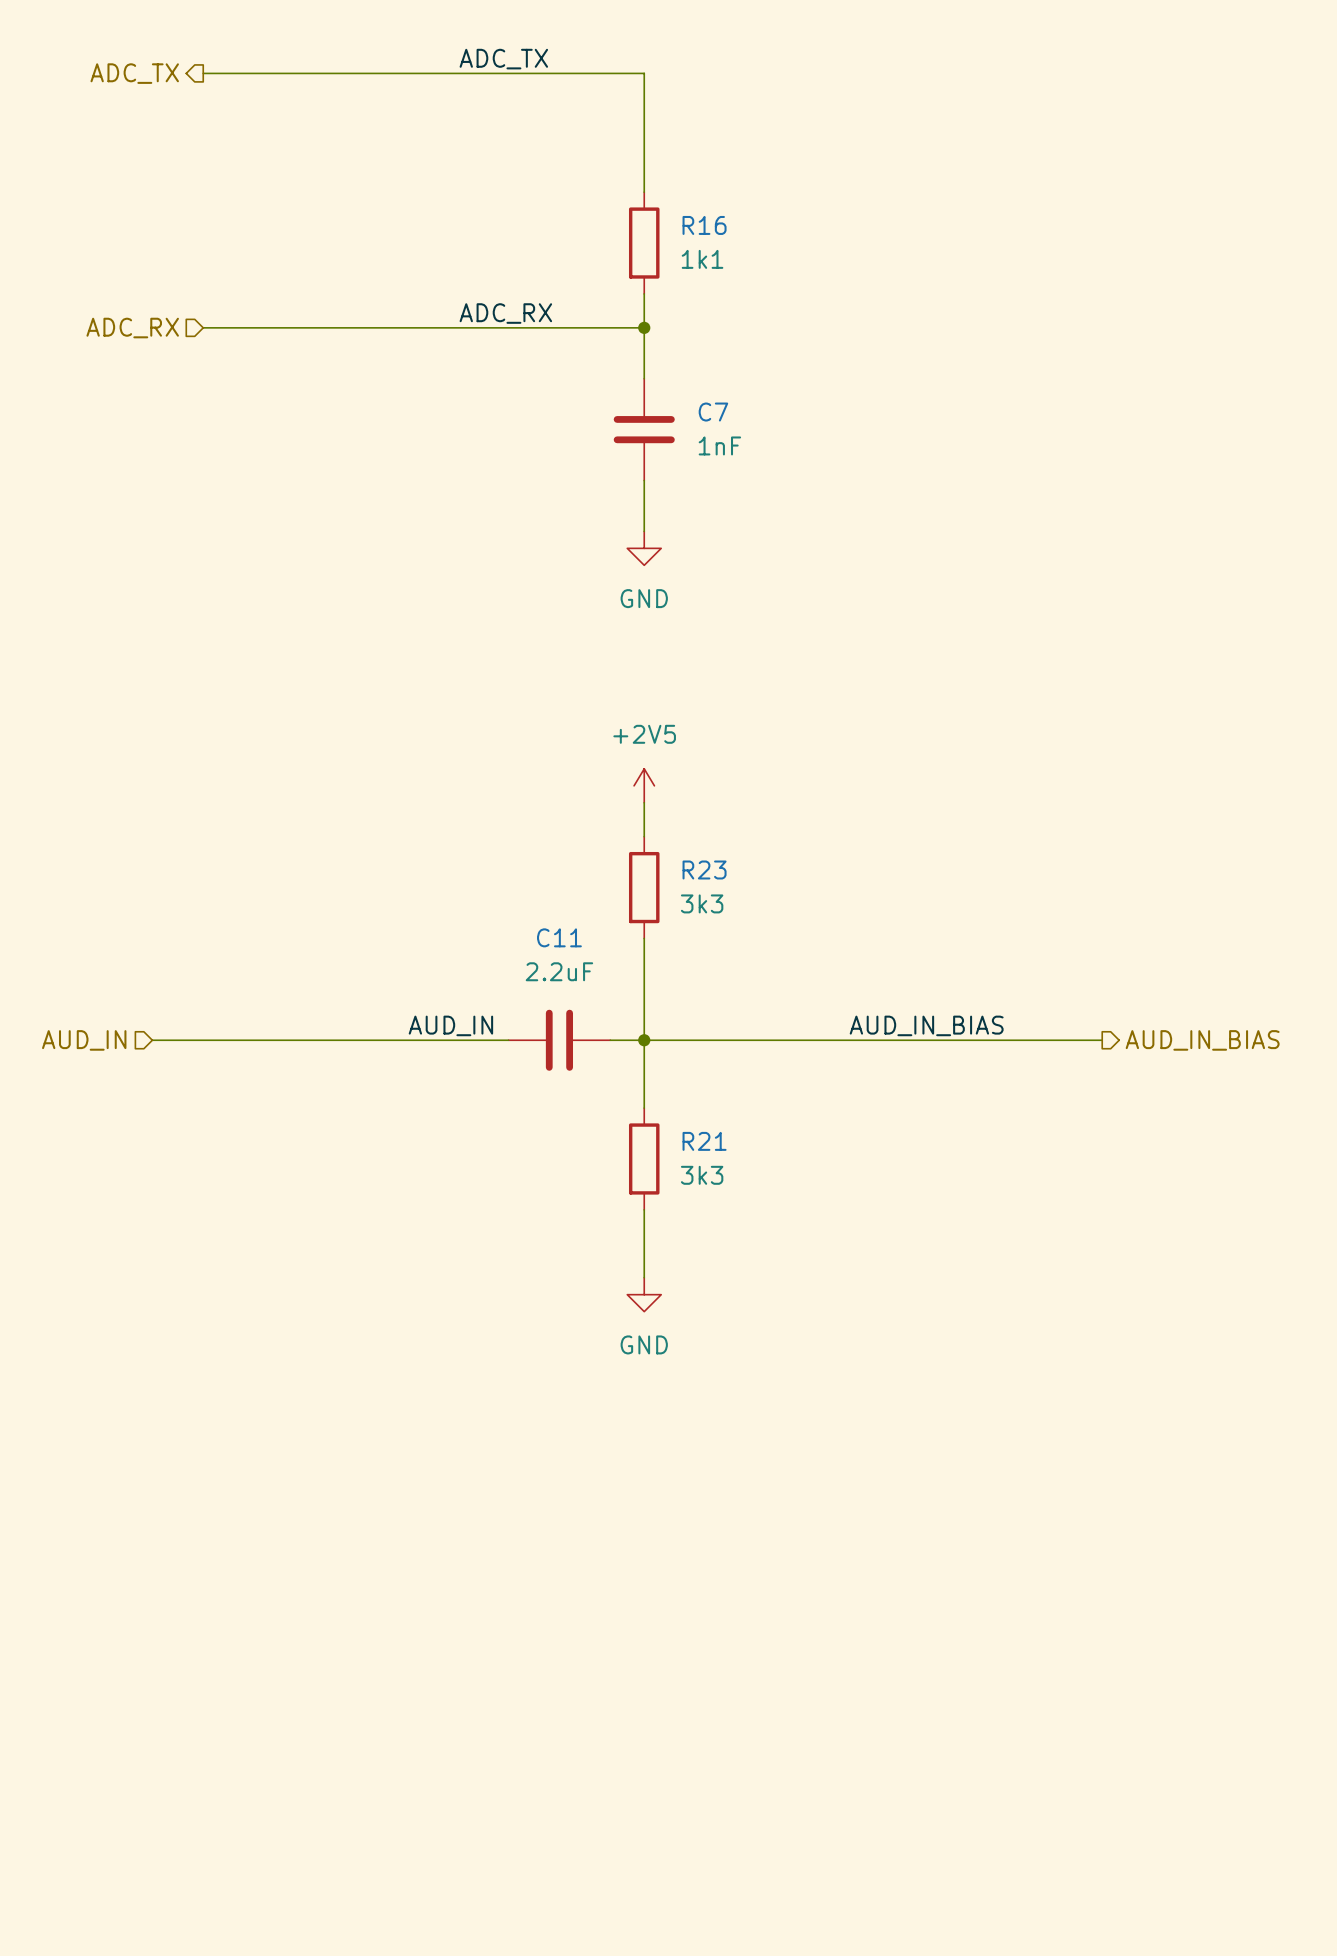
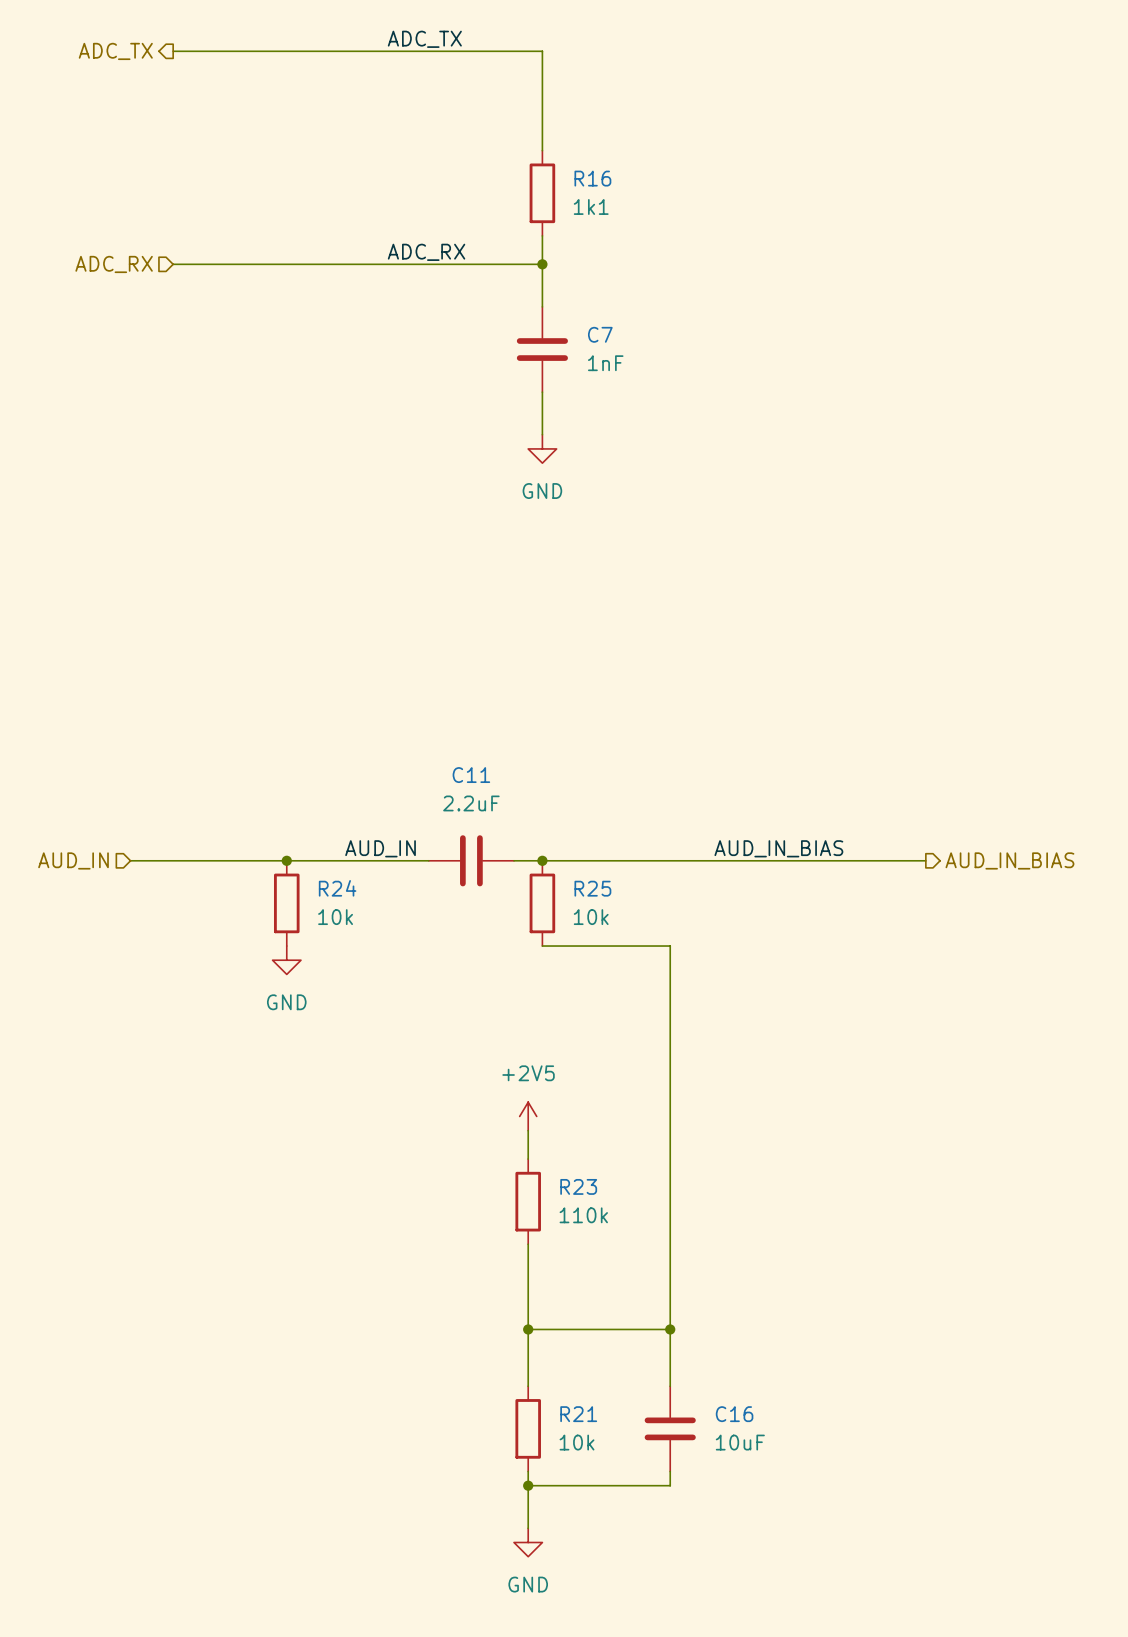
power symbol: +2V5 (644, 785) -> none
wire: (644, 802) (644, 836) -> none
R23 position: (644, 887) -> (528, 1201)
R23 value: 3k3 (702, 903) -> 110k (583, 1215)
wire: (644, 938) (644, 1108) -> none
junction: none -> (286, 860)
R24: none -> 10k (286, 903)
R25: none -> 10k (542, 903)
wire: none -> (542, 946) (670, 946) (670, 1386)
power symbol: none -> GND (286, 960)
R21 position: (644, 1158) -> (528, 1428)
R21 value: 3k3 (702, 1175) -> 10k (577, 1442)
wire: (644, 1209) (644, 1277) -> none
power symbol: GND (644, 1294) -> none
power symbol: none -> +2V5 (528, 1116)
wire: none -> (528, 1130) (528, 1159)
wire: none -> (528, 1244) (528, 1386)
wire: none -> (528, 1329) (670, 1329)
junction: none -> (528, 1329)
junction: none -> (670, 1329)
C16: none -> 10uF (670, 1428)
wire: none -> (528, 1471) (528, 1528)
wire: none -> (670, 1471) (670, 1485) (528, 1485)
junction: none -> (528, 1485)
power symbol: none -> GND (528, 1542)

